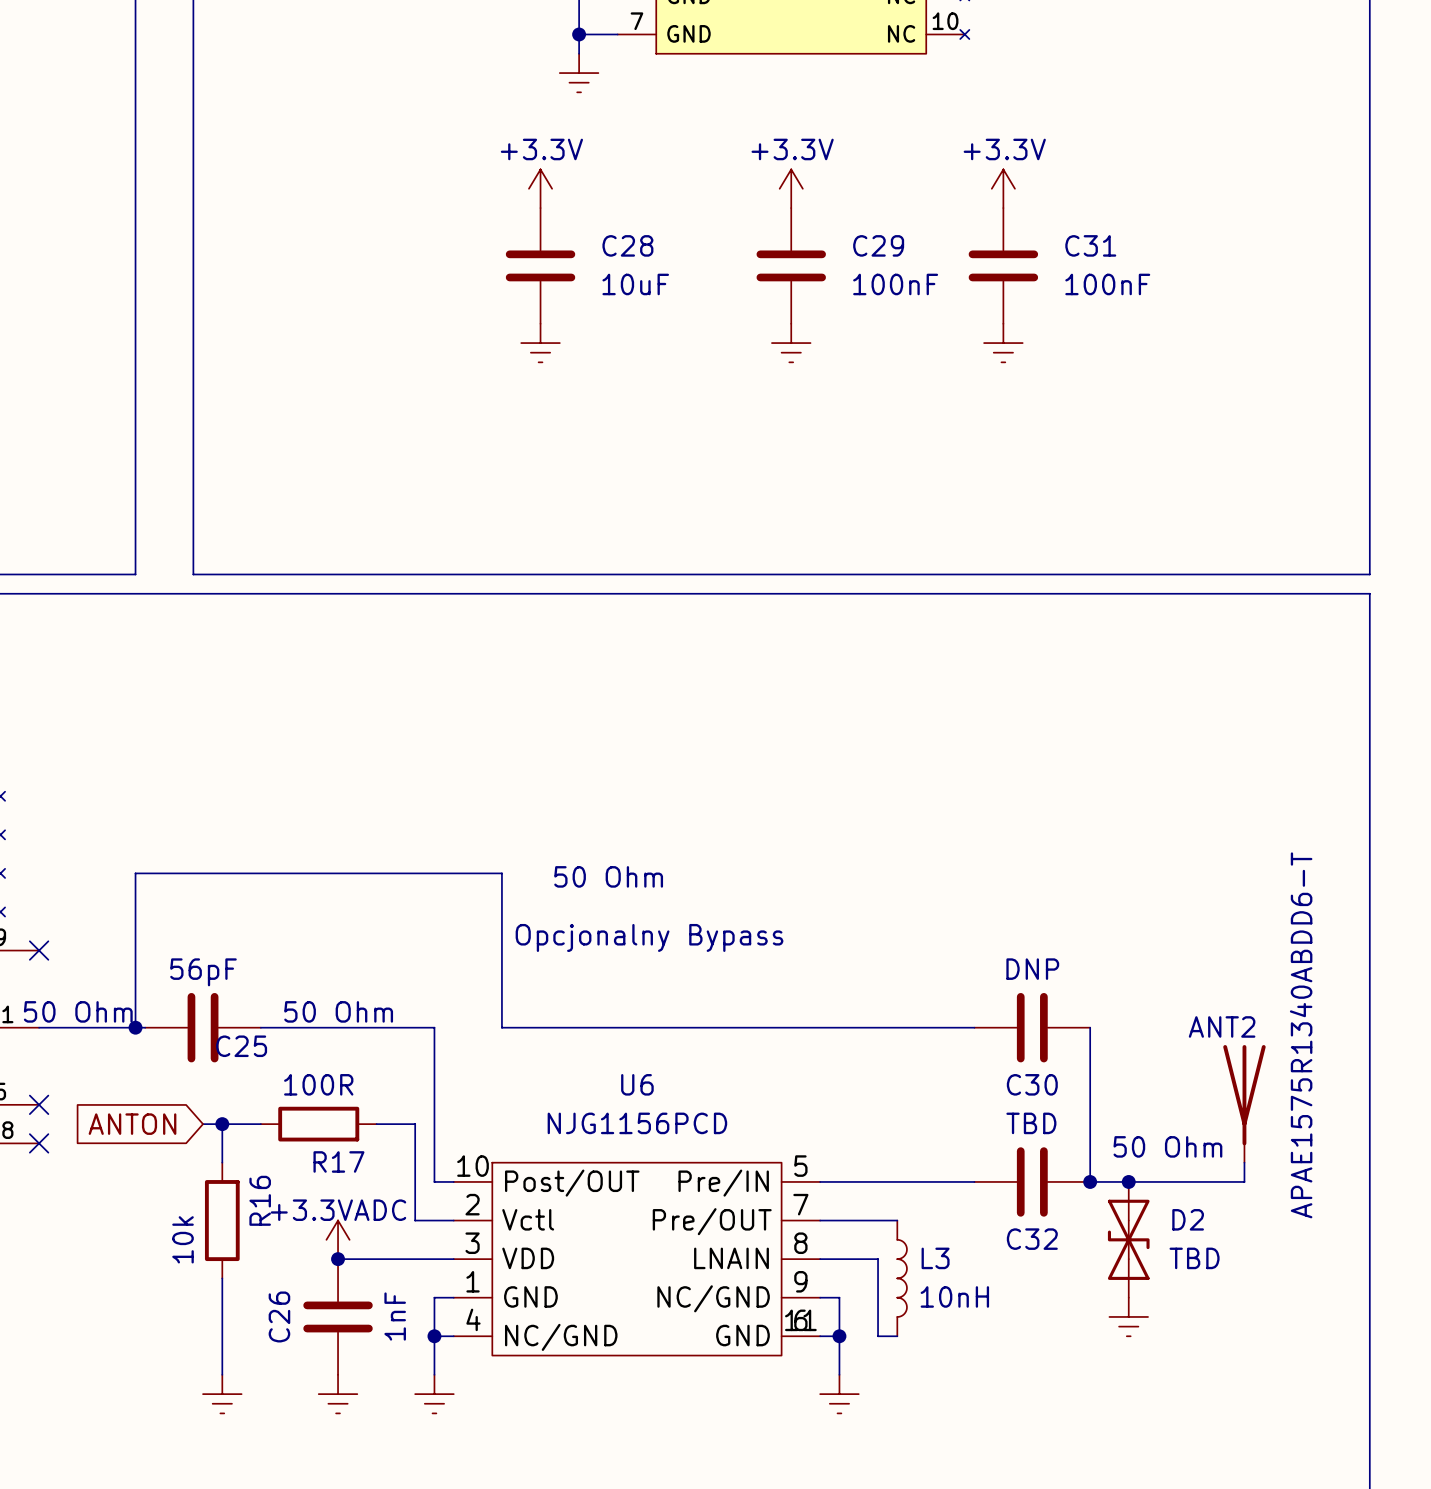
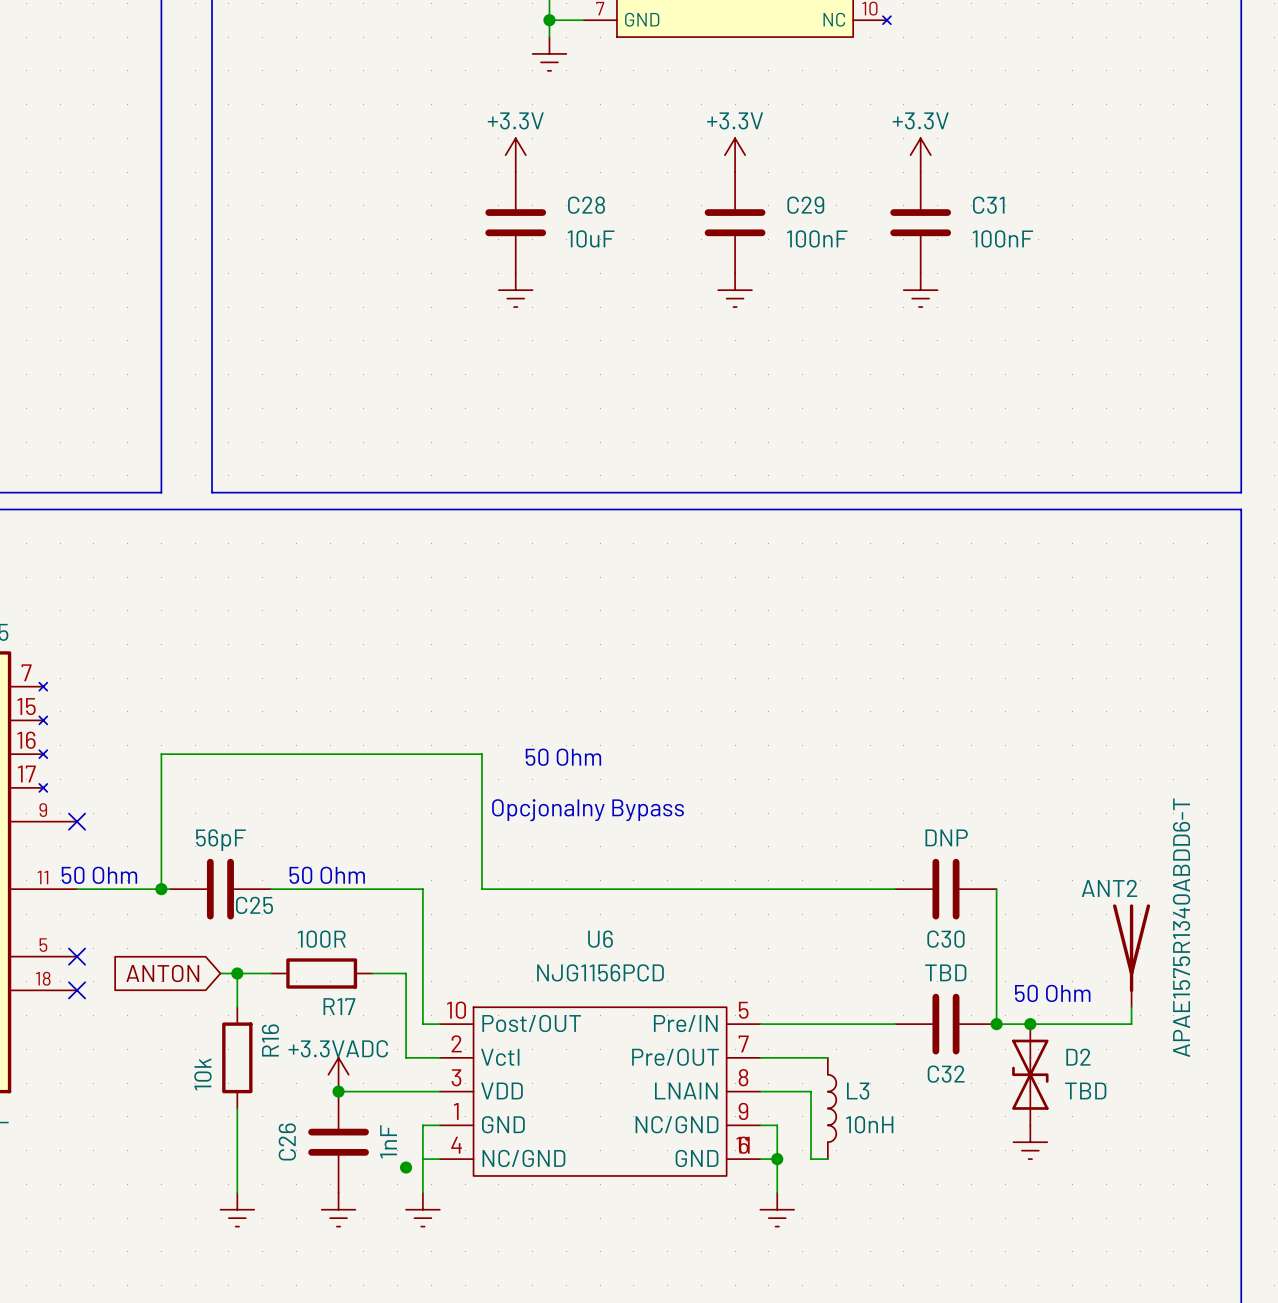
junction position: (434, 1336) -> (406, 1167)

